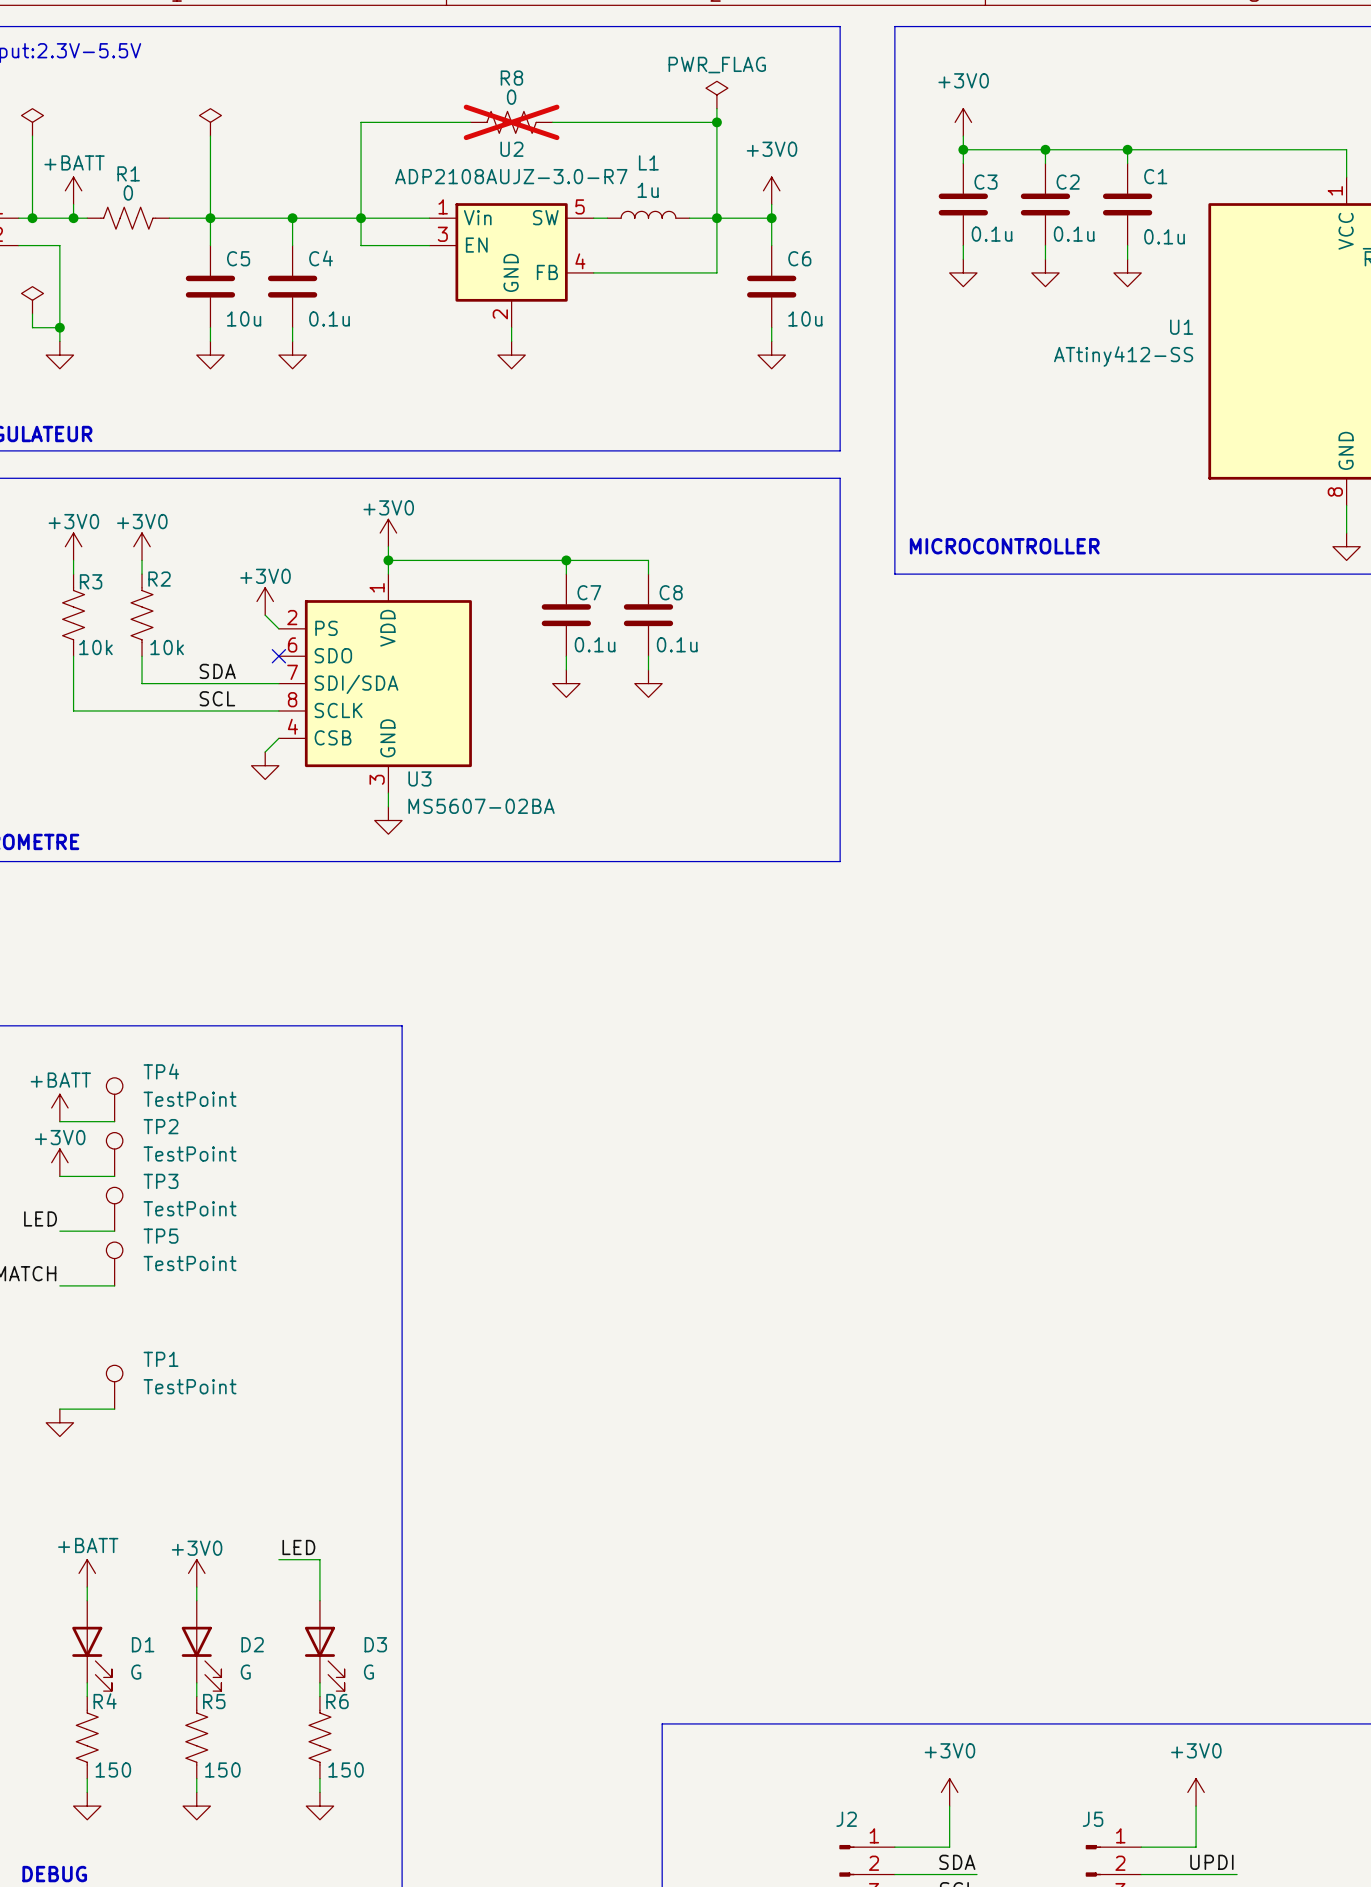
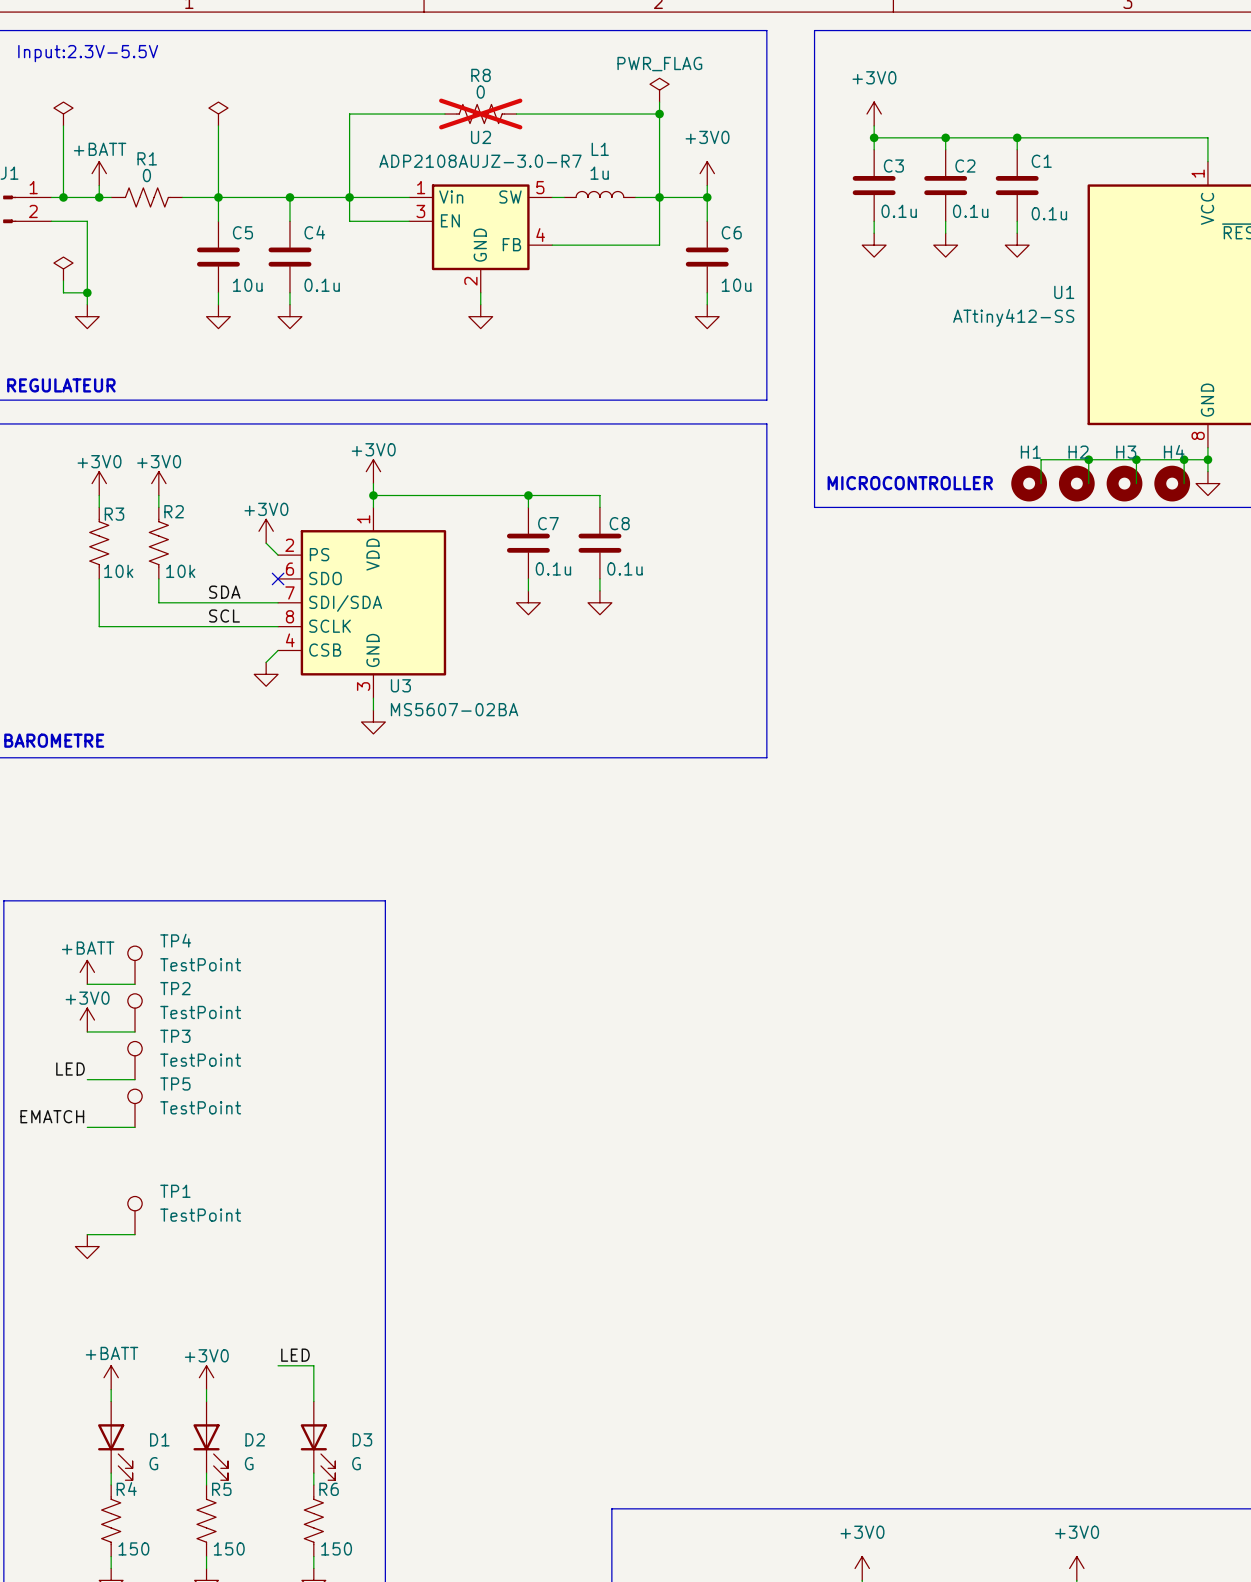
wire: none -> (1088, 459) (1088, 483)
junction: none -> (1088, 459)
wire: none -> (1136, 459) (1136, 483)
junction: none -> (1136, 459)
wire: none -> (1184, 459) (1184, 483)
junction: none -> (1184, 459)
wire: none -> (1207, 459) (1041, 459) (1041, 483)
junction: none -> (1207, 459)
H1: none -> (1029, 483)
H2: none -> (1076, 483)
H3: none -> (1124, 483)
H4: none -> (1172, 483)

